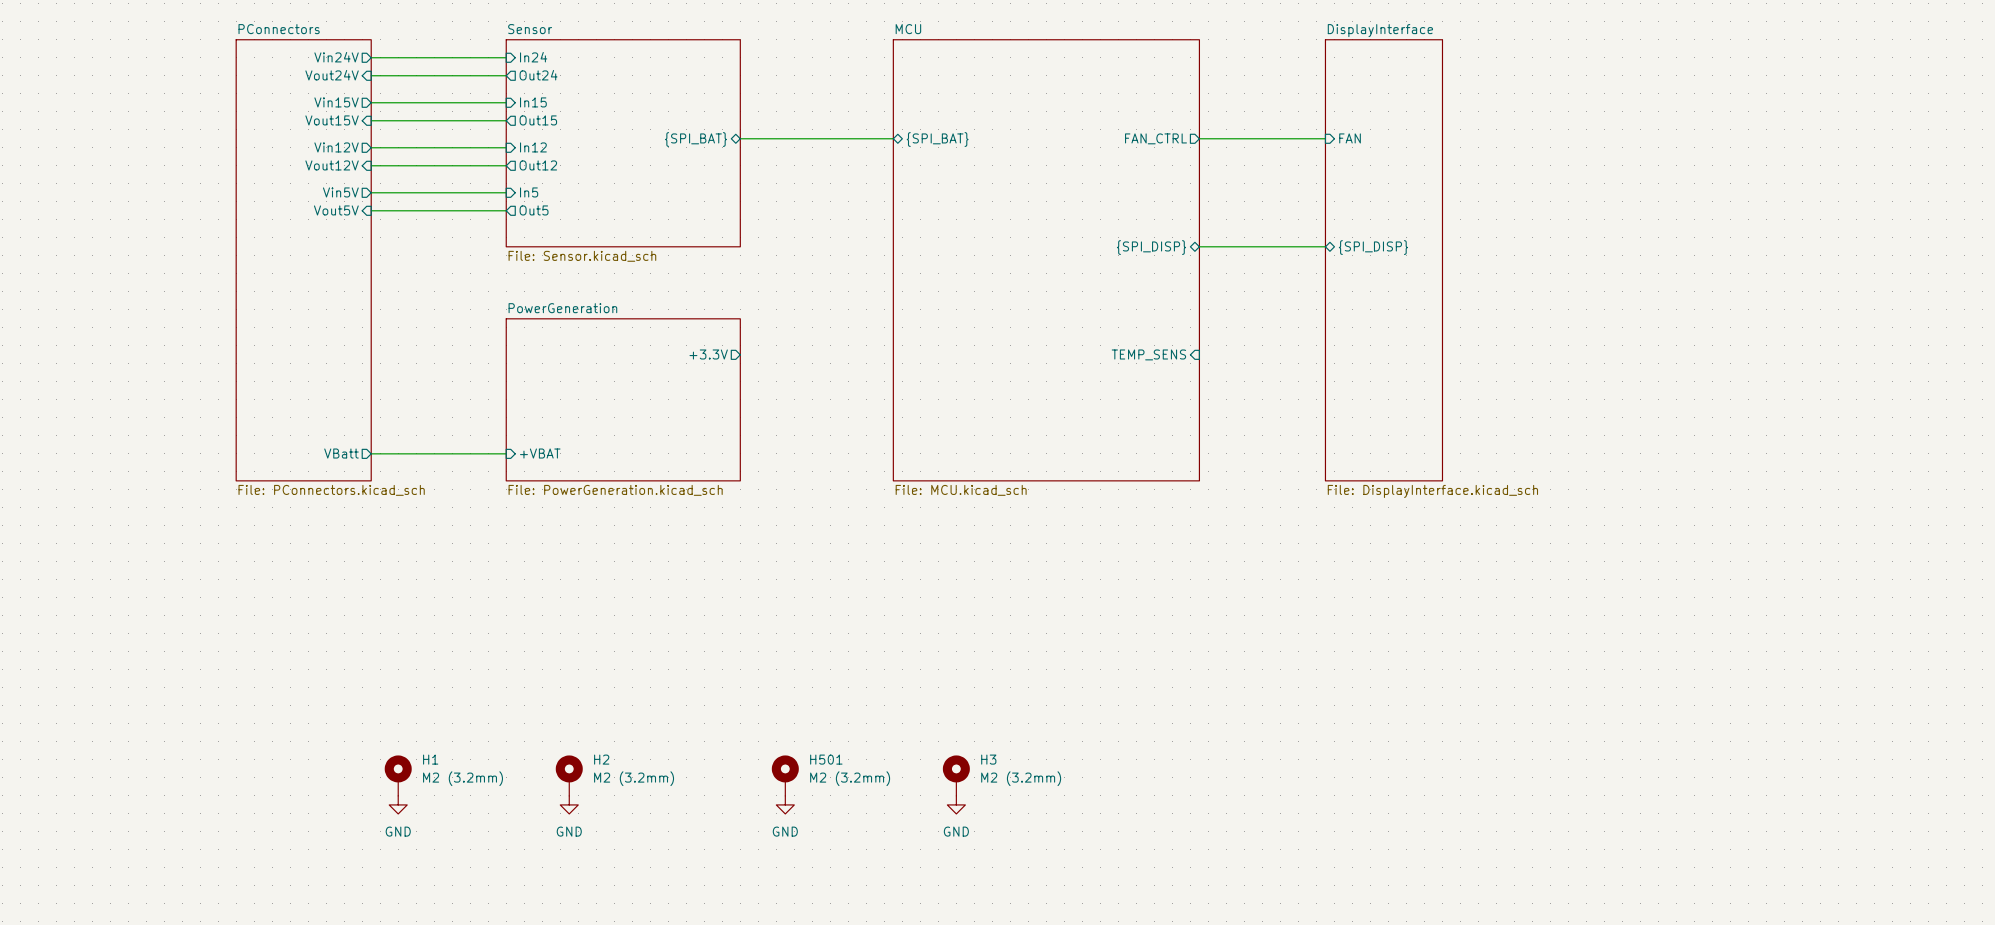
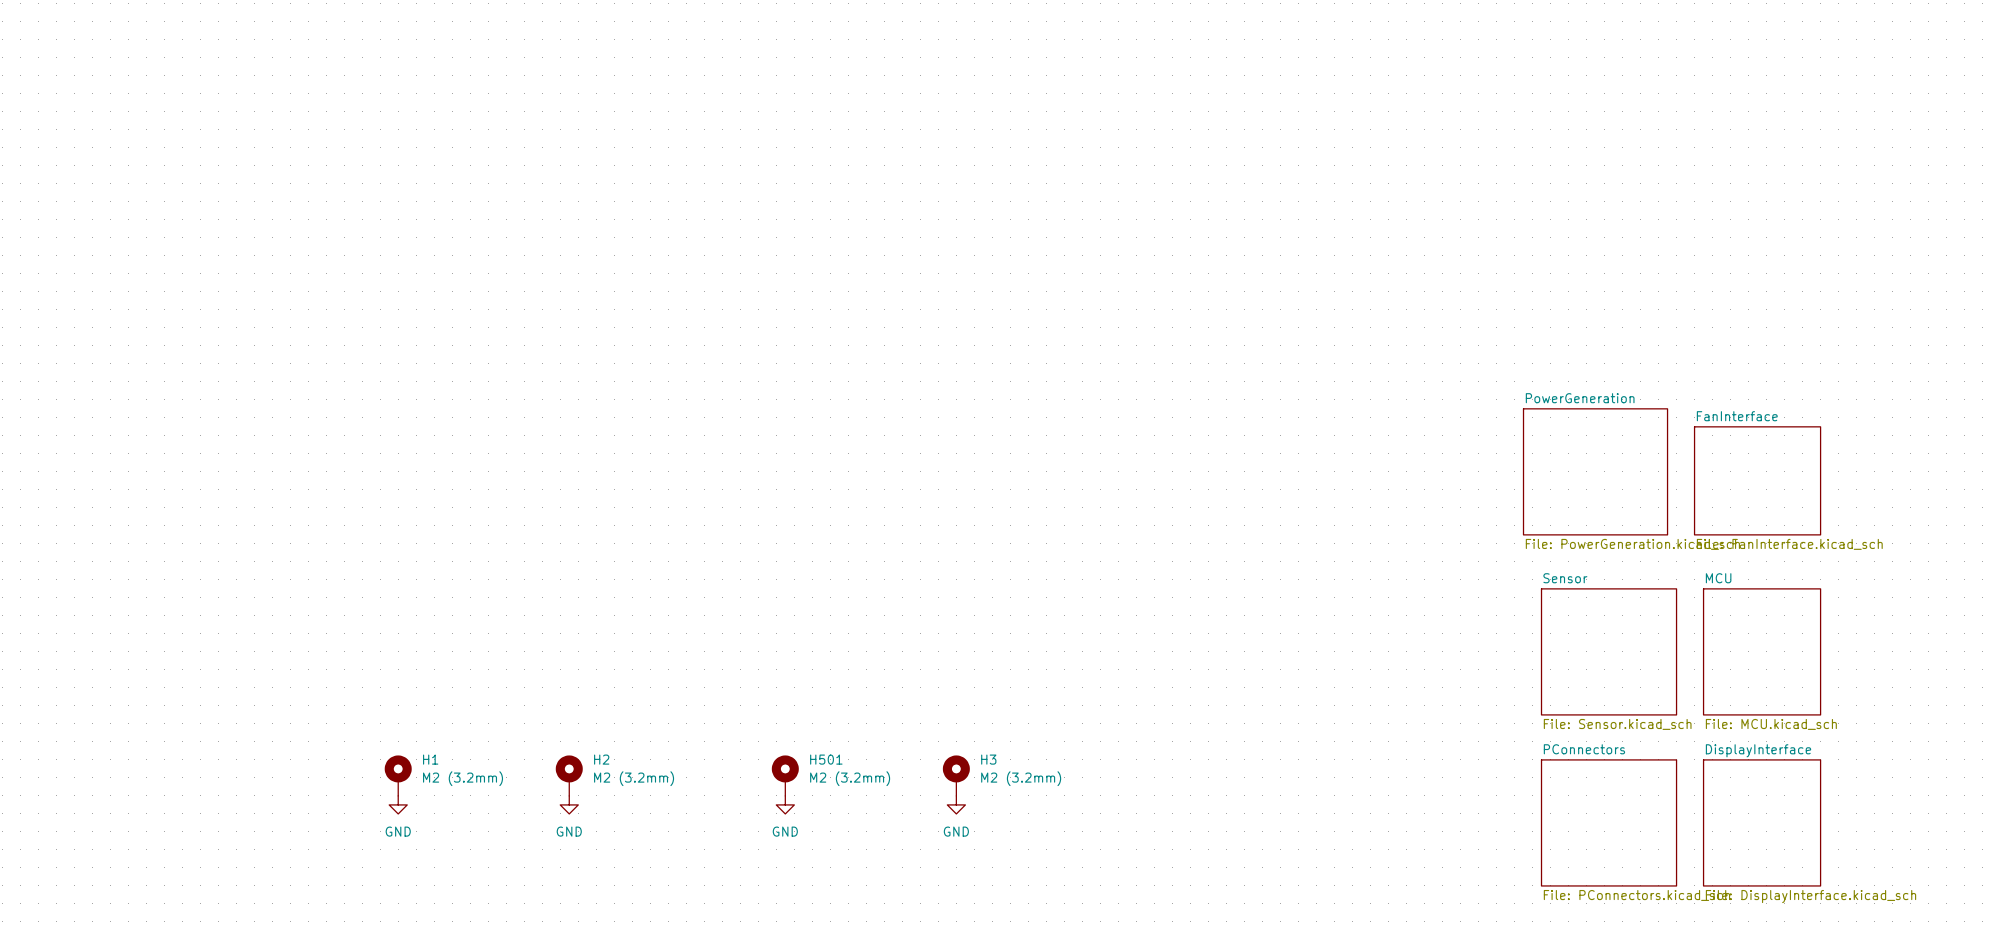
sheet pin: Vin24V (336, 57) -> none
wire: (371, 57) (506, 57) -> none
sheet pin: In24 (533, 57) -> none
sheet pin: Vout24V (332, 75) -> none
wire: (371, 75) (506, 75) -> none
sheet pin: Out24 (538, 75) -> none
sheet pin: Vin15V (336, 102) -> none
wire: (371, 102) (506, 102) -> none
sheet pin: In15 (533, 102) -> none
sheet pin: Vout15V (332, 120) -> none
wire: (371, 120) (506, 120) -> none
sheet pin: Out15 (538, 120) -> none
wire: (740, 138) (893, 138) -> none
sheet pin: FAN_CTRL (1155, 138) -> none
wire: (1199, 138) (1325, 138) -> none
sheet pin: FAN (1350, 138) -> none
sheet pin: {SPI_BAT} (696, 139) -> none
sheet pin: {SPI_BAT} (937, 139) -> none
sheet Sensor: File: Sensor.kicad_sch (623, 143) -> none
sheet pin: Vin12V (336, 147) -> none
wire: (371, 147) (506, 147) -> none
sheet pin: In12 (533, 147) -> none
sheet pin: Vout12V (332, 165) -> none
wire: (371, 165) (506, 165) -> none
sheet pin: Out12 (538, 165) -> none
sheet pin: Vin5V (340, 192) -> none
wire: (371, 192) (506, 192) -> none
sheet pin: In5 (529, 192) -> none
sheet pin: Vout5V (336, 210) -> none
wire: (371, 210) (506, 210) -> none
sheet pin: Out5 (534, 210) -> none
wire: (1199, 246) (1325, 246) -> none
sheet pin: {SPI_DISP} (1151, 247) -> none
sheet pin: {SPI_DISP} (1373, 247) -> none
sheet PConnectors: File: PConnectors.kicad_sch (303, 260) -> none
sheet MCU: File: MCU.kicad_sch (1046, 260) -> none
sheet DisplayInterface: File: DisplayInterface.kicad_sch (1383, 260) -> none
sheet pin: +3.3V (708, 354) -> none
sheet pin: TEMP_SENS (1148, 354) -> none
sheet PowerGeneration: File: PowerGeneration.kicad_sch (623, 399) -> none
sheet pin: VBatt (341, 453) -> none
wire: (371, 453) (506, 453) -> none
sheet pin: +VBAT (540, 453) -> none
sheet PowerGeneration: none -> File: PowerGeneration.kicad_sch (1595, 471)
sheet FanInterface: none -> File: FanInterface.kicad_sch (1757, 480)
sheet Sensor: none -> File: Sensor.kicad_sch (1609, 651)
sheet MCU: none -> File: MCU.kicad_sch (1762, 651)
sheet PConnectors: none -> File: PConnectors.kicad_sch (1609, 822)
sheet DisplayInterface: none -> File: DisplayInterface.kicad_sch (1762, 822)

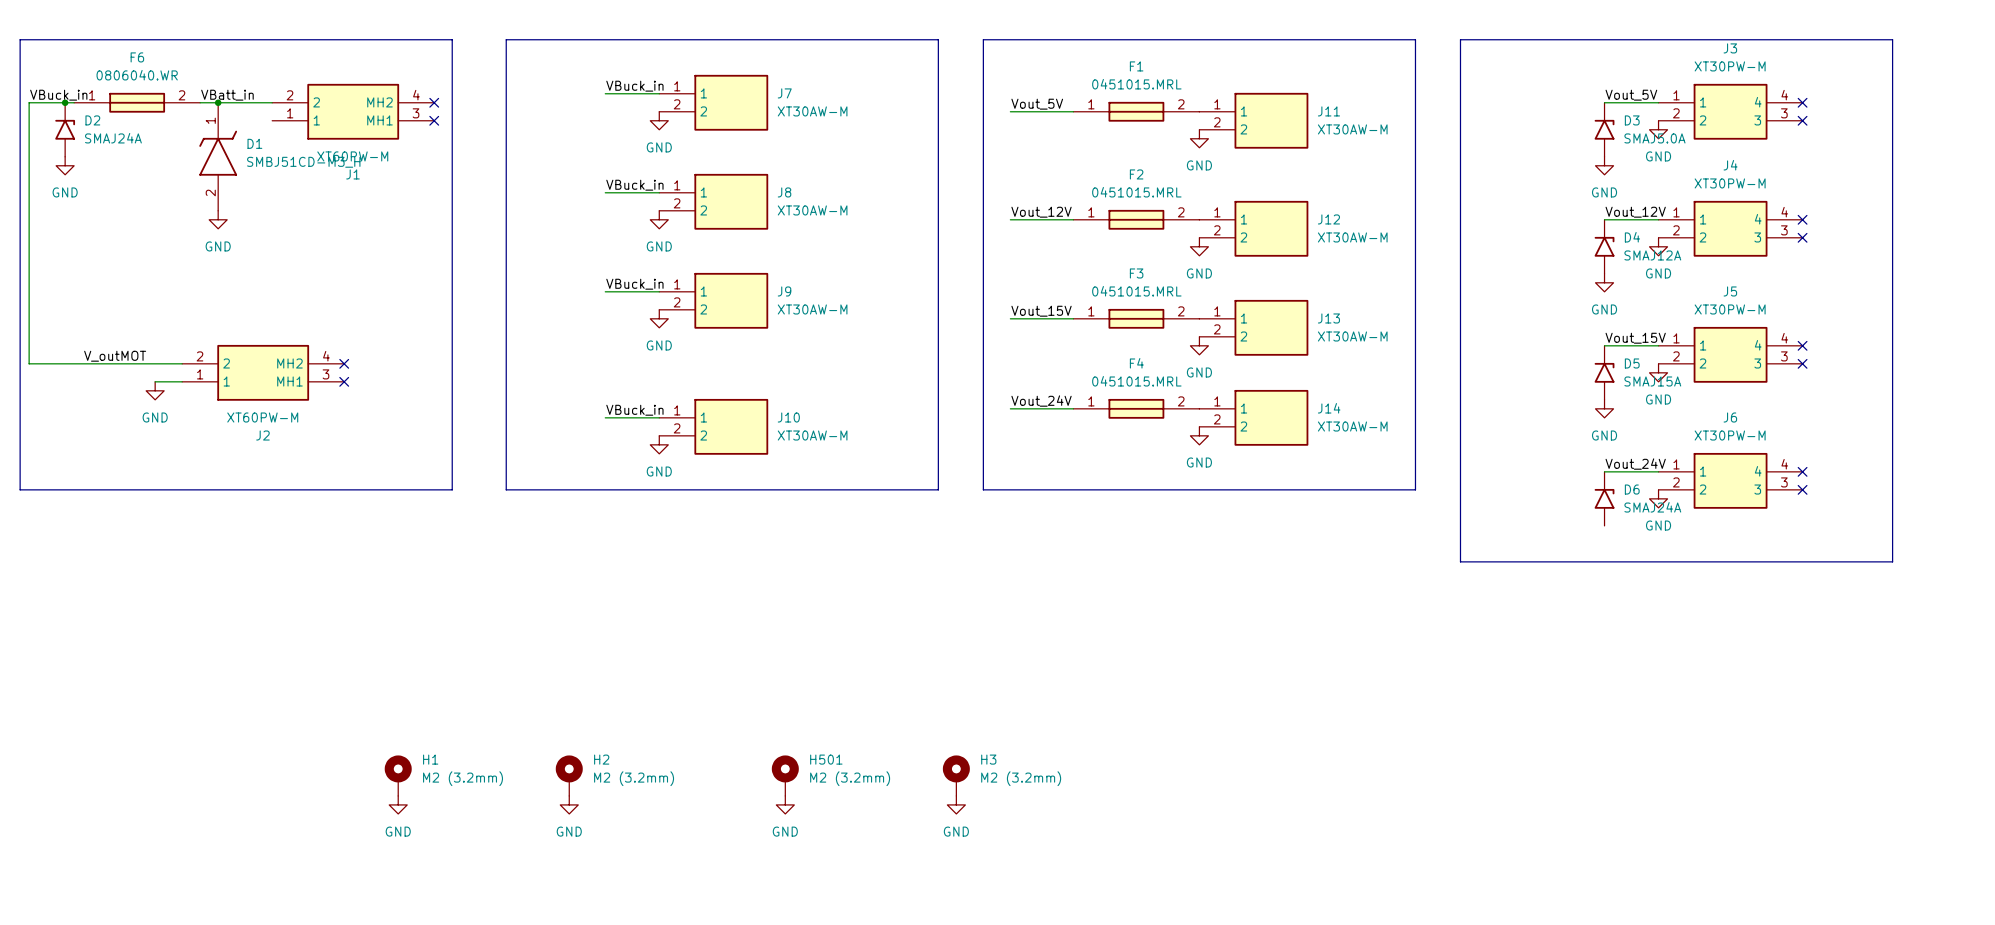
line: none -> (20, 39) (452, 39) (452, 489) (20, 489) (20, 39)
line: none -> (506, 39) (938, 39) (938, 489) (506, 489) (506, 39)
line: none -> (983, 39) (1415, 39) (1415, 489) (983, 489) (983, 39)
line: none -> (1460, 39) (1892, 39) (1892, 561) (1460, 561) (1460, 39)
label: none -> VBuck_in (634, 86)
wire: none -> (605, 93) (659, 93)
label: none -> VBuck_in (58, 95)
label: none -> VBatt_in (227, 95)
label: none -> Vout_5V (1631, 95)
junction: none -> (65, 102)
wire: none -> (74, 102) (29, 102) (29, 363) (182, 363)
F6: none -> 0806040.WR (137, 102)
wire: none -> (200, 102) (272, 102)
junction: none -> (218, 102)
no-connect mark: none -> (434, 102)
J7: none -> XT30AW-M (713, 102)
wire: none -> (1604, 102) (1658, 102)
no-connect mark: none -> (1802, 102)
label: none -> Vout_5V (1037, 104)
J1: none -> XT60PW-M (353, 111)
wire: none -> (1010, 111) (1073, 111)
F1: none -> 0451015.MRL (1136, 111)
J3: none -> XT30PW-M (1730, 111)
no-connect mark: none -> (434, 120)
power symbol: none -> GND (659, 120)
J11: none -> XT30AW-M (1253, 120)
no-connect mark: none -> (1802, 120)
D2: none -> SMAJ24A (65, 129)
D3: none -> SMAJ5.0A (1604, 129)
power symbol: none -> GND (1658, 129)
power symbol: none -> GND (1199, 138)
D1: none -> SMBJ51CD-M3_H (218, 156)
power symbol: none -> GND (65, 165)
power symbol: none -> GND (1604, 165)
label: none -> VBuck_in (634, 185)
wire: none -> (605, 192) (659, 192)
J8: none -> XT30AW-M (713, 201)
label: none -> Vout_12V (1041, 212)
label: none -> Vout_12V (1635, 212)
power symbol: none -> GND (218, 219)
power symbol: none -> GND (659, 219)
wire: none -> (1010, 219) (1073, 219)
F2: none -> 0451015.MRL (1136, 219)
wire: none -> (1604, 219) (1658, 219)
no-connect mark: none -> (1802, 219)
J12: none -> XT30AW-M (1253, 228)
J4: none -> XT30PW-M (1730, 228)
no-connect mark: none -> (1802, 237)
power symbol: none -> GND (1199, 246)
D4: none -> SMAJ12A (1604, 246)
power symbol: none -> GND (1658, 246)
power symbol: none -> GND (1604, 282)
label: none -> VBuck_in (634, 284)
wire: none -> (605, 291) (659, 291)
J9: none -> XT30AW-M (713, 300)
label: none -> Vout_15V (1041, 311)
power symbol: none -> GND (659, 318)
wire: none -> (1010, 318) (1073, 318)
F3: none -> 0451015.MRL (1136, 318)
J13: none -> XT30AW-M (1253, 327)
label: none -> Vout_15V (1635, 338)
power symbol: none -> GND (1199, 345)
wire: none -> (1604, 345) (1658, 345)
no-connect mark: none -> (1802, 345)
J5: none -> XT30PW-M (1730, 354)
label: none -> V_outMOT (115, 356)
no-connect mark: none -> (344, 363)
no-connect mark: none -> (1802, 363)
J2: none -> XT60PW-M (263, 372)
D5: none -> SMAJ15A (1604, 372)
power symbol: none -> GND (1658, 372)
wire: none -> (155, 381) (182, 381)
no-connect mark: none -> (344, 381)
power symbol: none -> GND (155, 390)
label: none -> Vout_24V (1041, 401)
wire: none -> (1010, 408) (1073, 408)
F4: none -> 0451015.MRL (1136, 408)
power symbol: none -> GND (1604, 408)
label: none -> VBuck_in (634, 410)
wire: none -> (605, 417) (659, 417)
J14: none -> XT30AW-M (1253, 417)
J10: none -> XT30AW-M (713, 426)
power symbol: none -> GND (1199, 435)
power symbol: none -> GND (659, 444)
label: none -> Vout_24V (1635, 464)
sheet PowerGeneration: File: PowerGeneration.kicad_sch (1595, 471) -> none
wire: none -> (1604, 471) (1658, 471)
no-connect mark: none -> (1802, 471)
J6: none -> XT30PW-M (1730, 480)
sheet FanInterface: File: FanInterface.kicad_sch (1757, 480) -> none
no-connect mark: none -> (1802, 489)
D6: none -> SMAJ24A (1604, 498)
power symbol: none -> GND (1658, 498)
sheet Sensor: File: Sensor.kicad_sch (1609, 651) -> none
sheet MCU: File: MCU.kicad_sch (1762, 651) -> none
sheet PConnectors: File: PConnectors.kicad_sch (1609, 822) -> none
sheet DisplayInterface: File: DisplayInterface.kicad_sch (1762, 822) -> none

